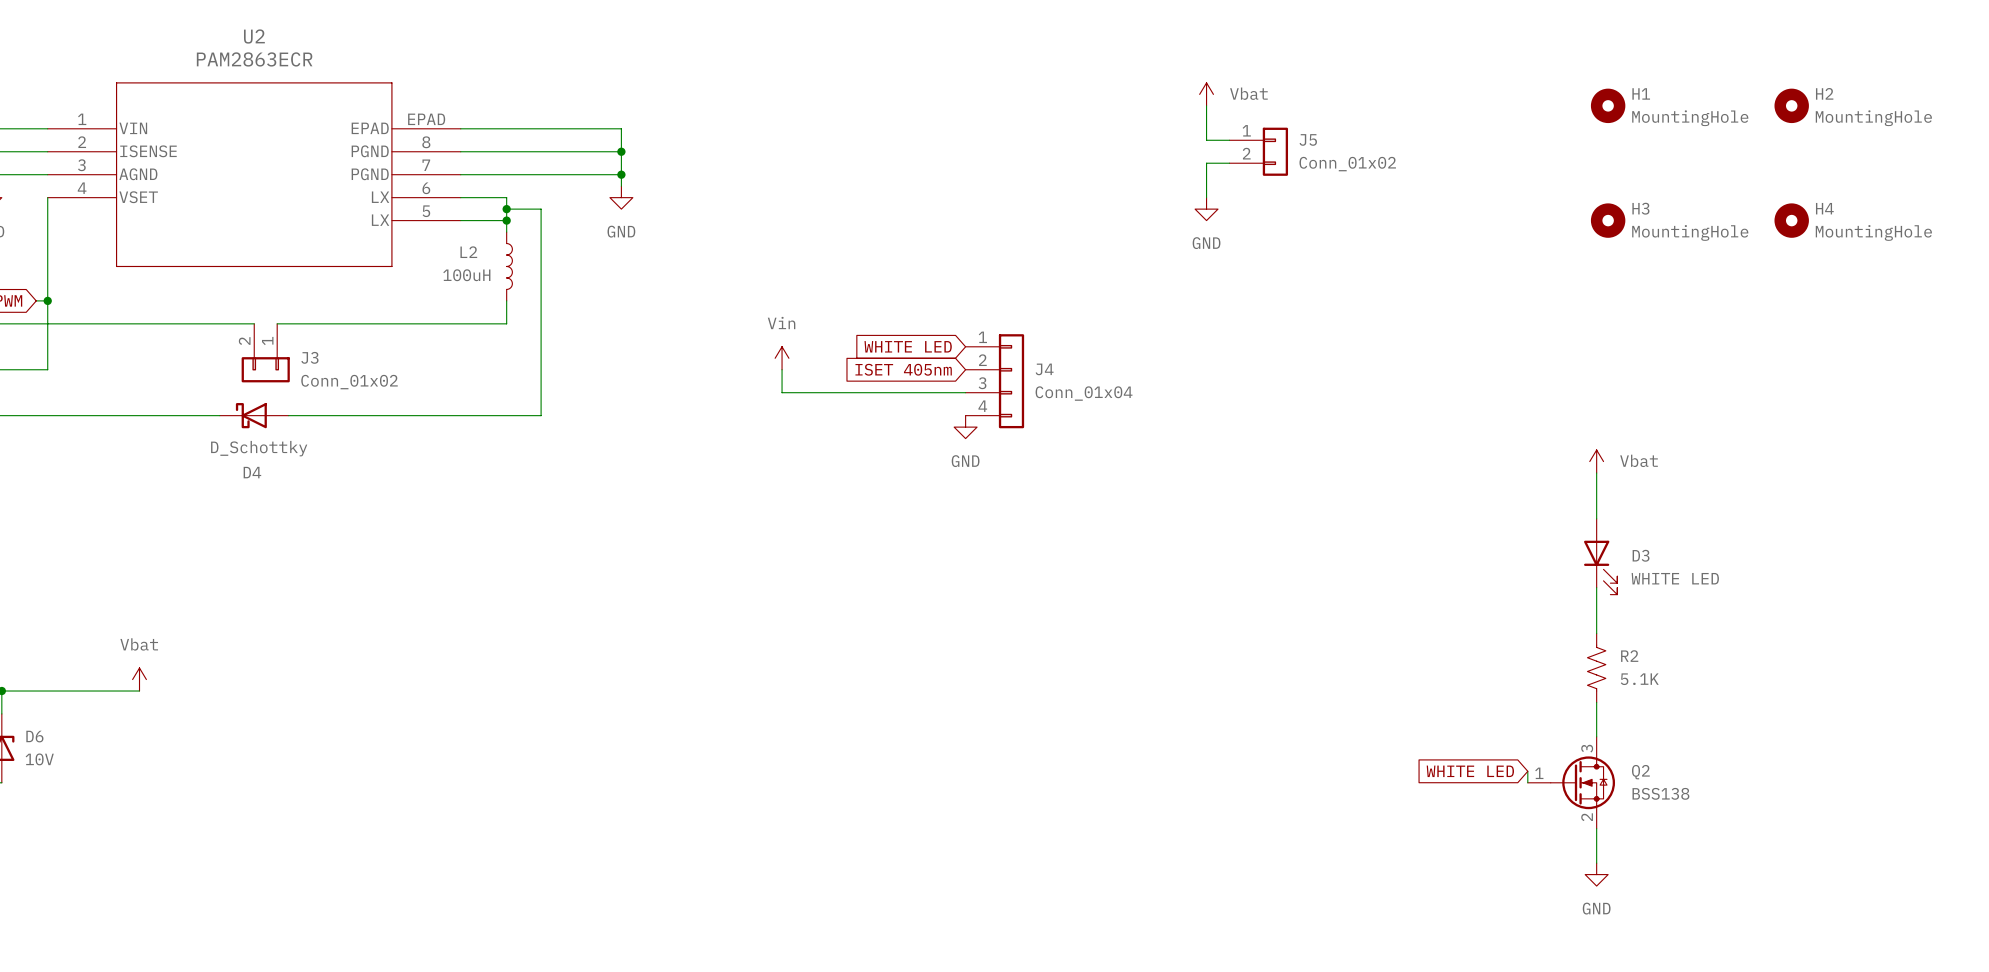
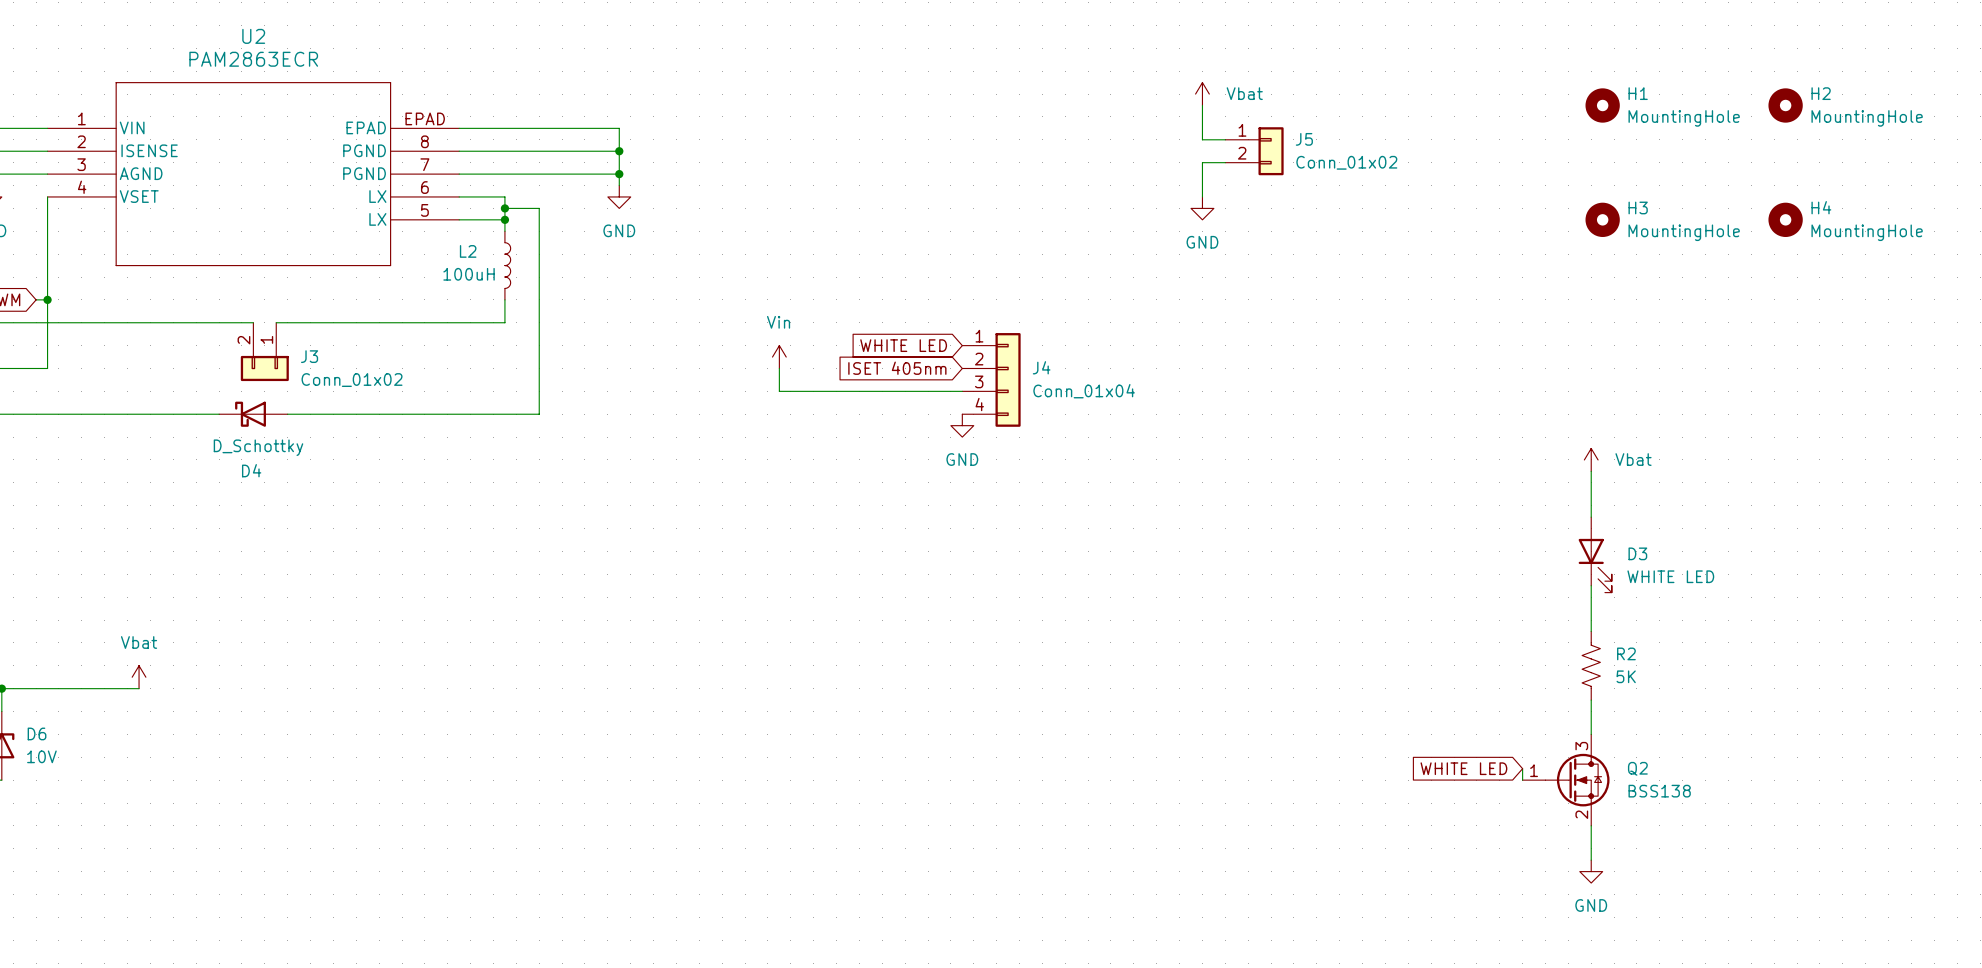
R2 value: 5.1K (1639, 679) -> 5K (1626, 676)

